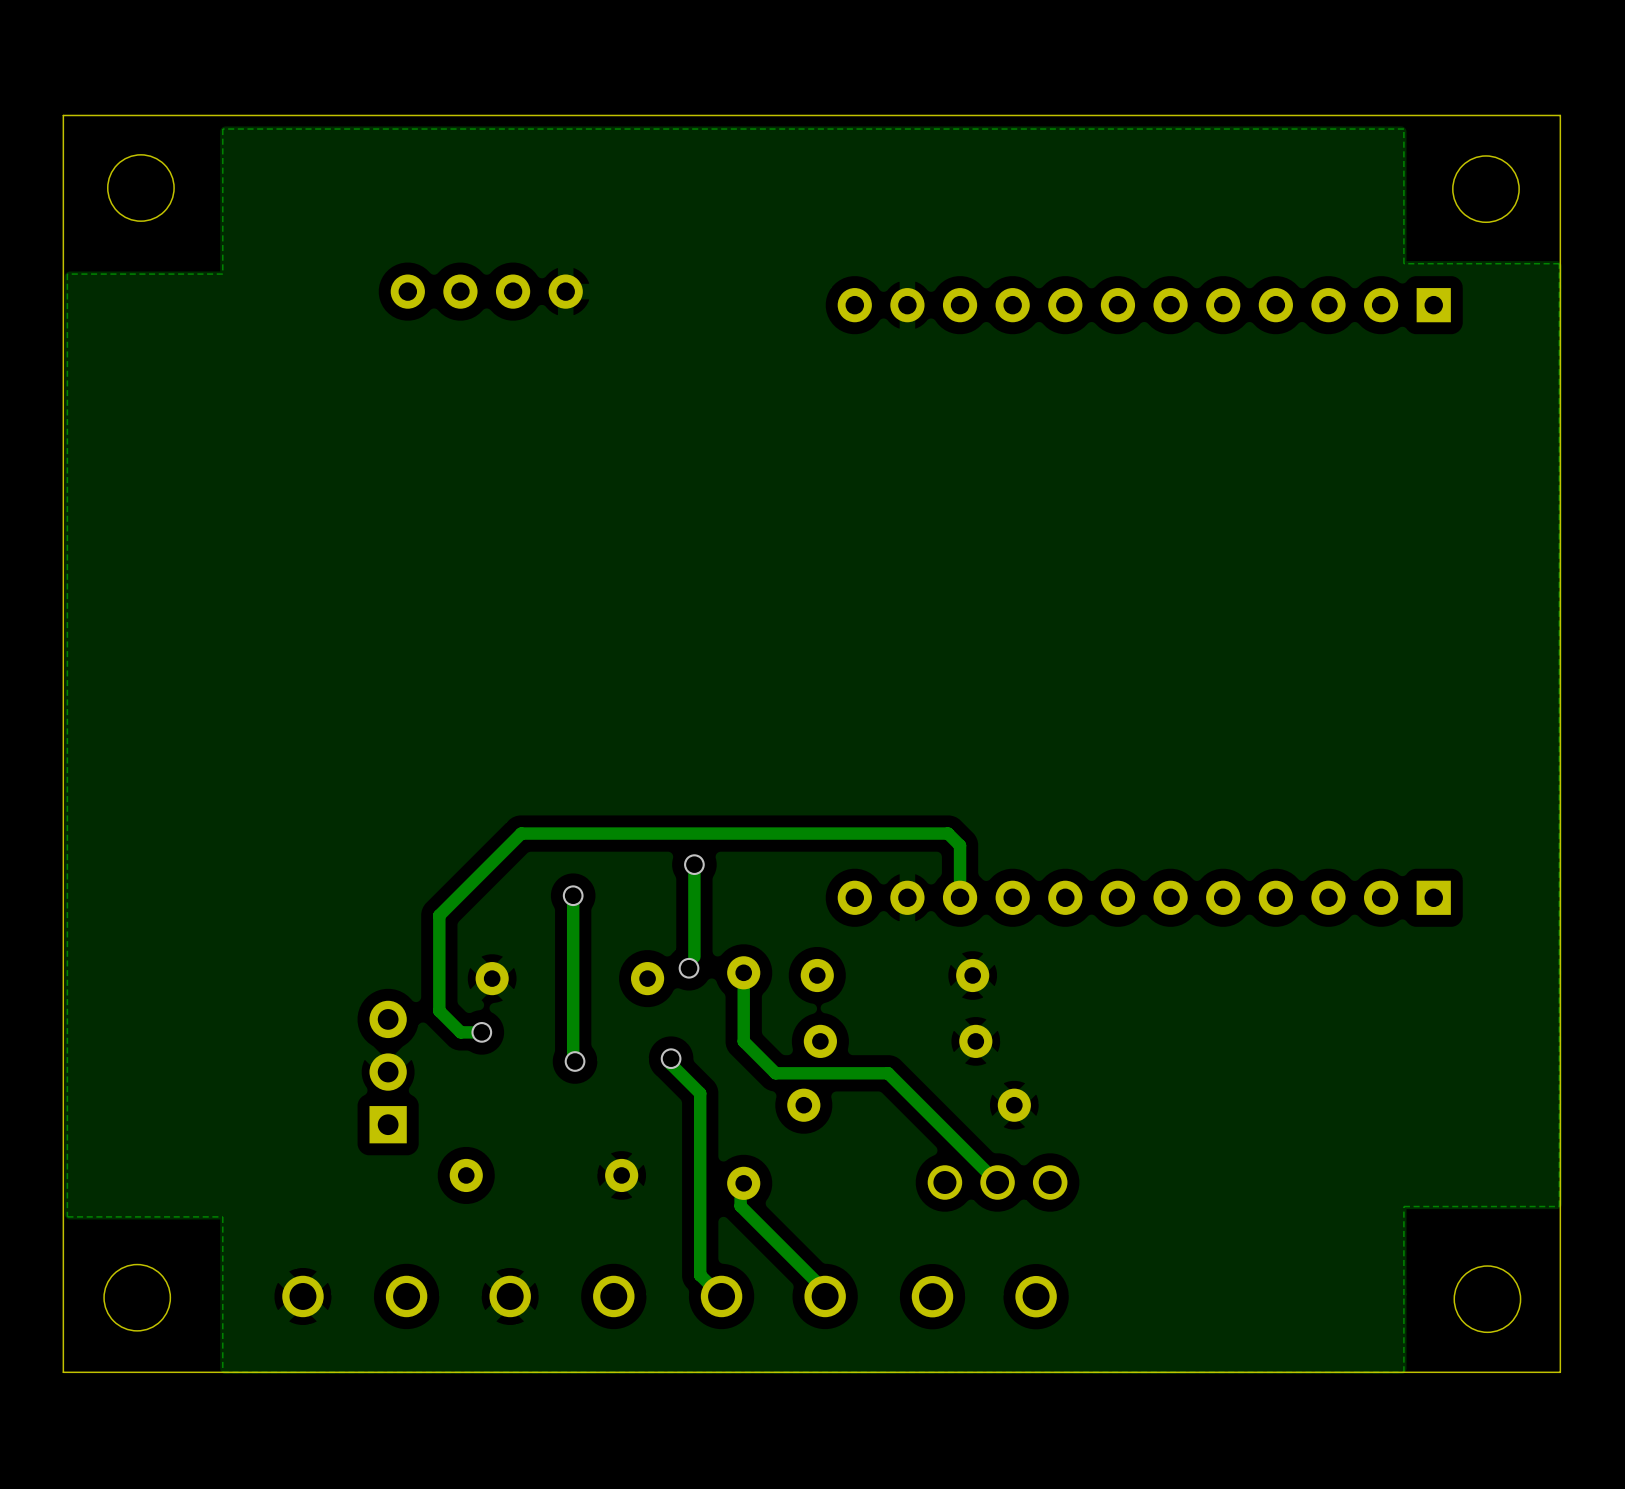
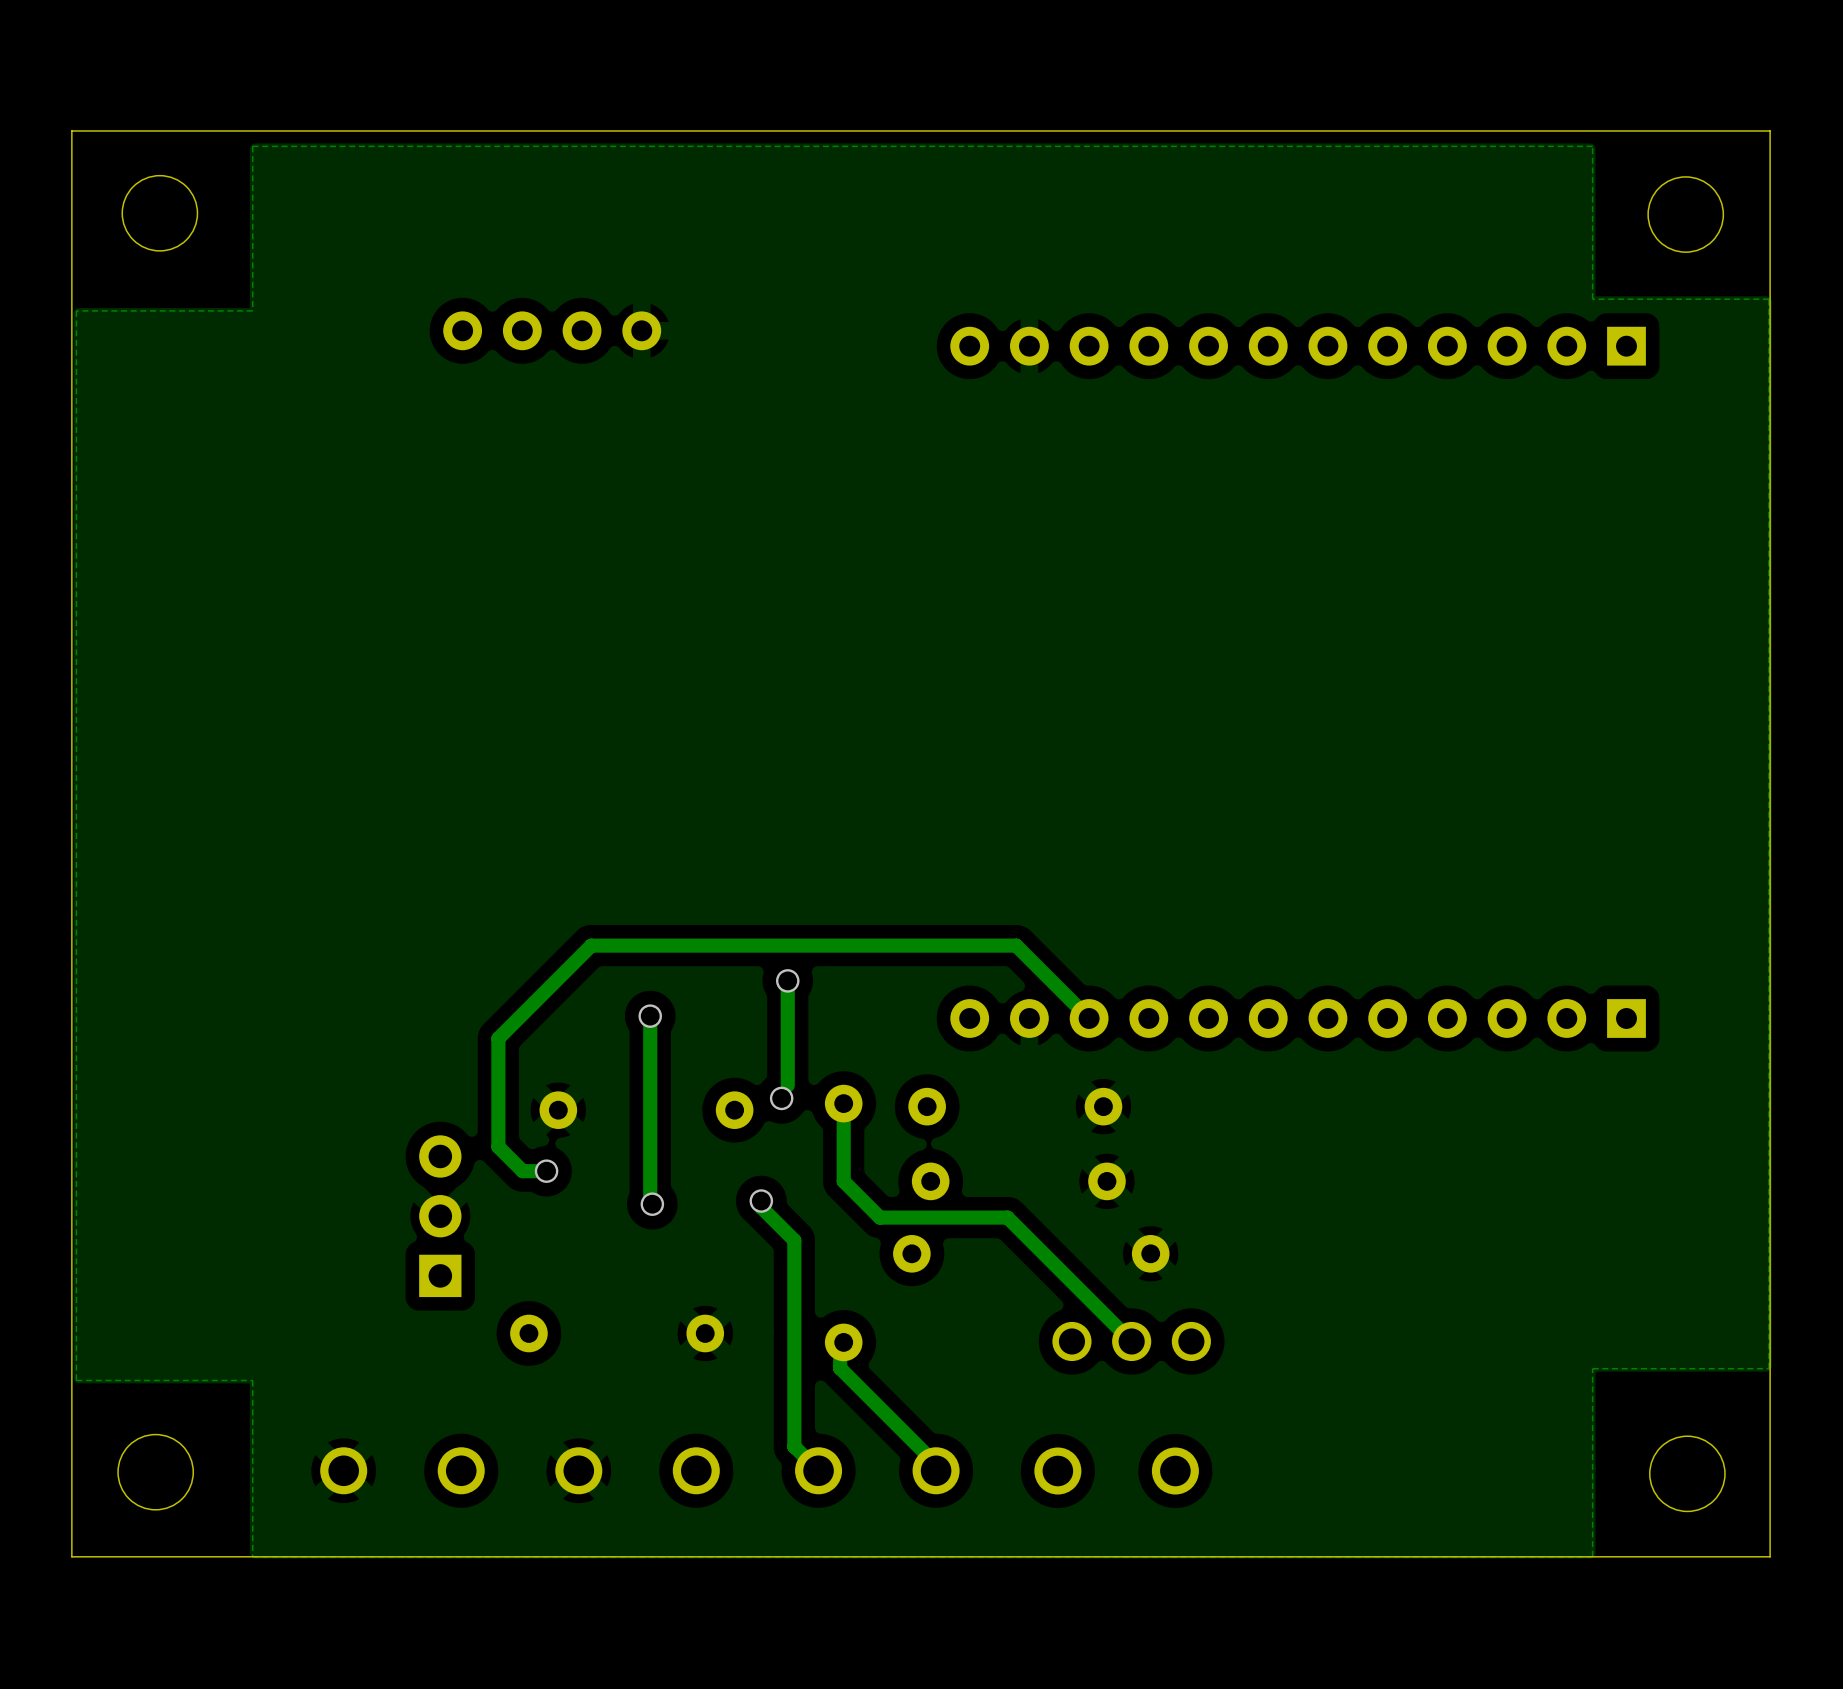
track: (895, 833) (948, 833) (960, 845) (960, 897) -> (1016, 945) (1089, 1018)

